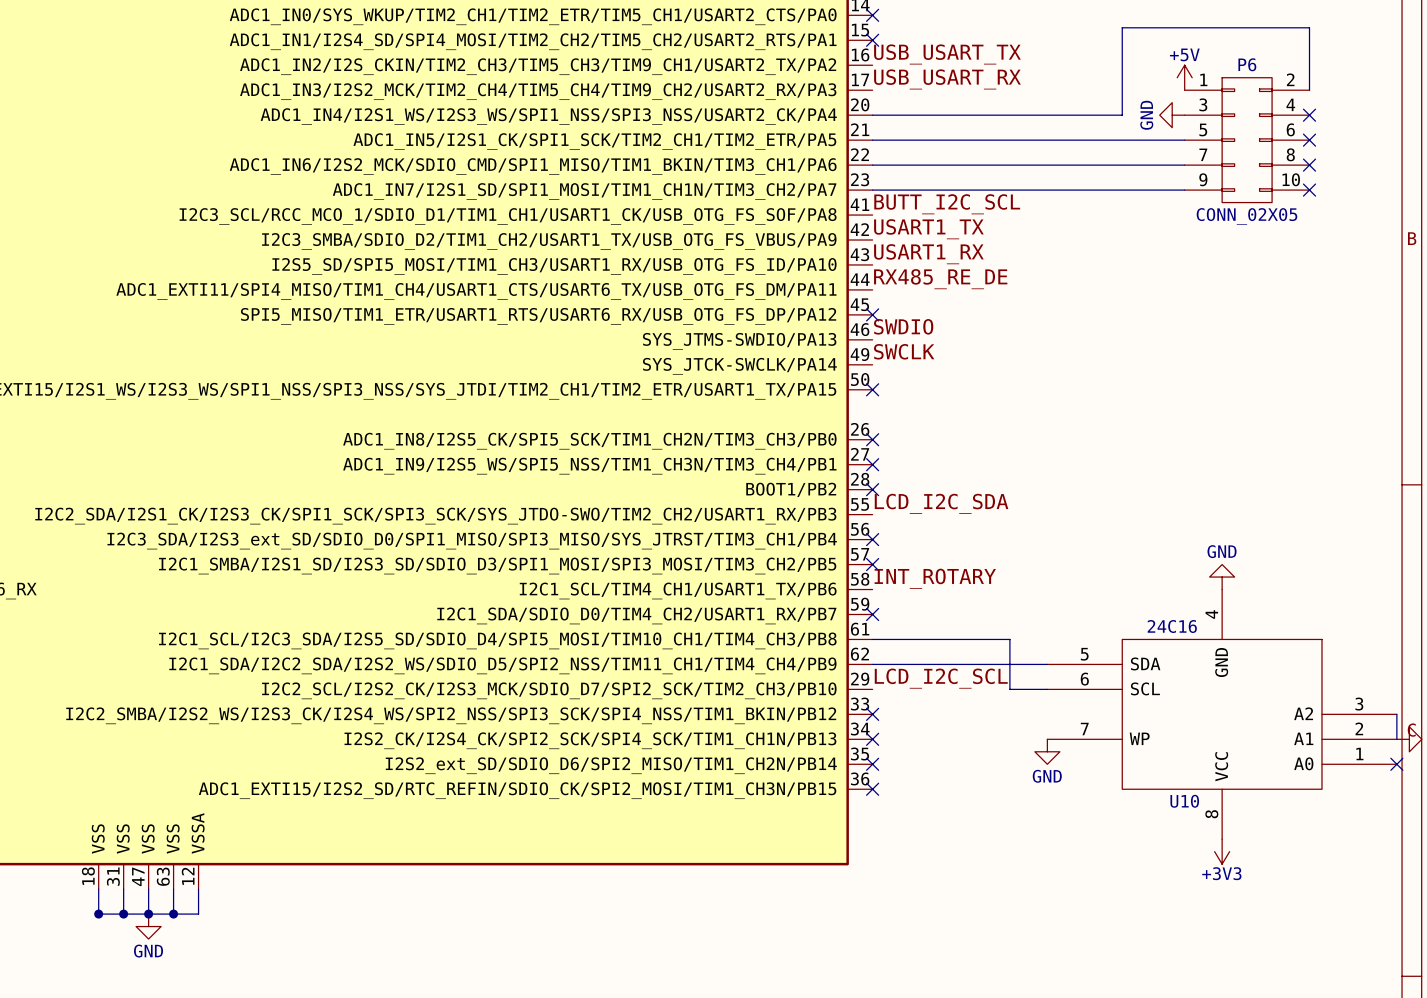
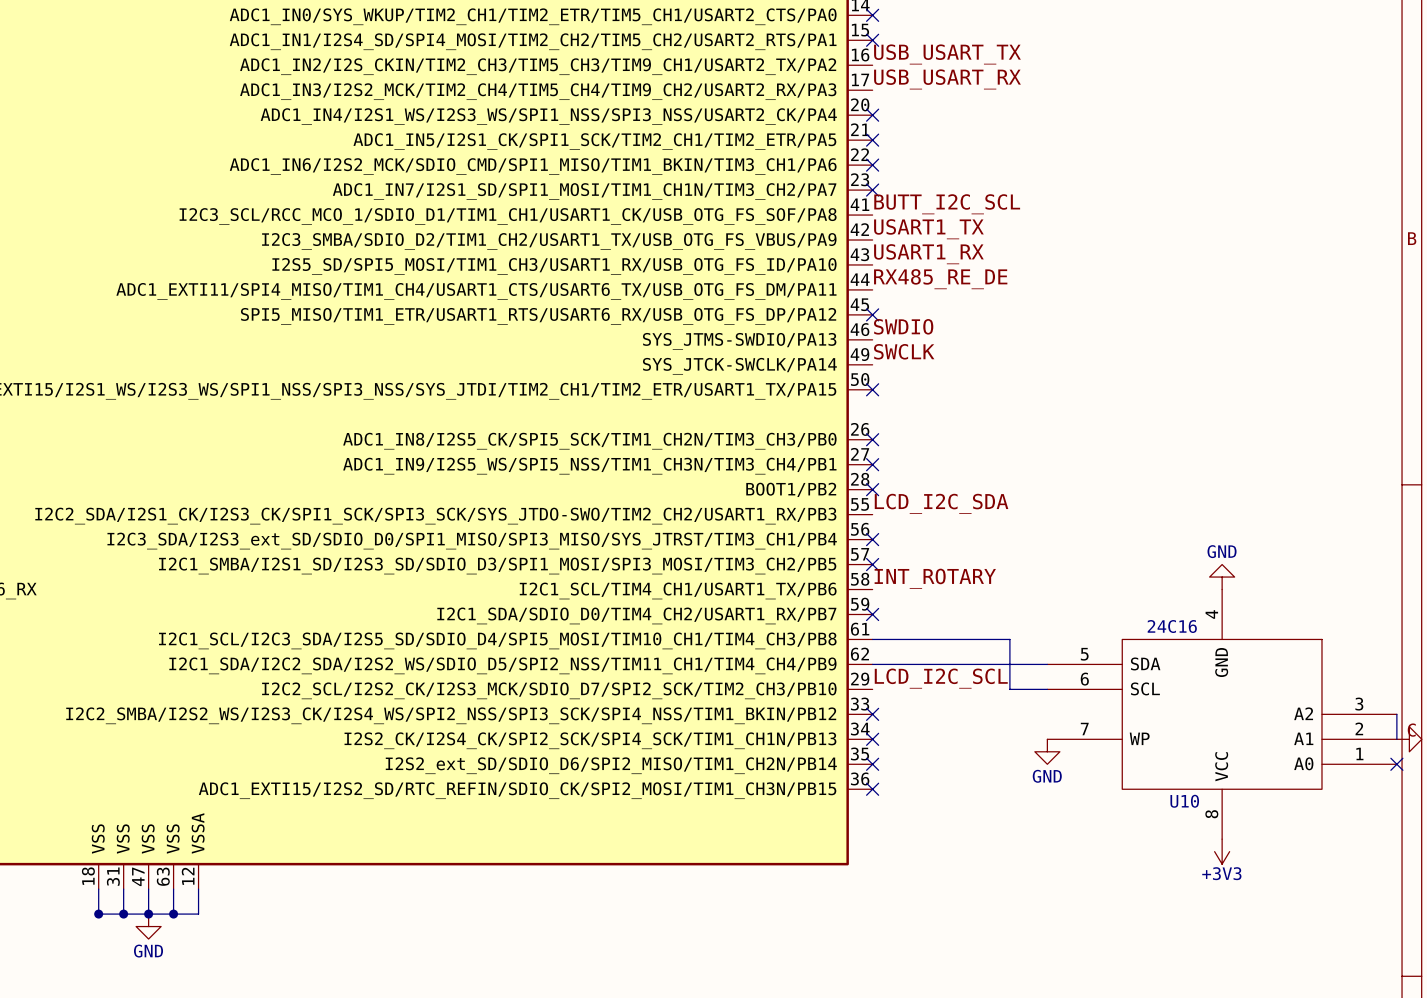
power symbol: +5V (1184, 77) -> none
wire: (1309, 90) (1309, 27) (1122, 27) (1122, 115) (872, 115) -> none
no-connect mark: none -> (872, 115)
power symbol: GND (1172, 115) -> none
no-connect mark: (1309, 115) -> none
wire: (872, 140) (1184, 140) -> none
no-connect mark: none -> (872, 140)
P6: CONN_02X05 (1247, 140) -> none
no-connect mark: (1309, 140) -> none
wire: (872, 165) (1184, 165) -> none
no-connect mark: none -> (872, 165)
no-connect mark: (1309, 165) -> none
wire: (872, 190) (1184, 190) -> none
no-connect mark: none -> (872, 190)
no-connect mark: (1309, 190) -> none

